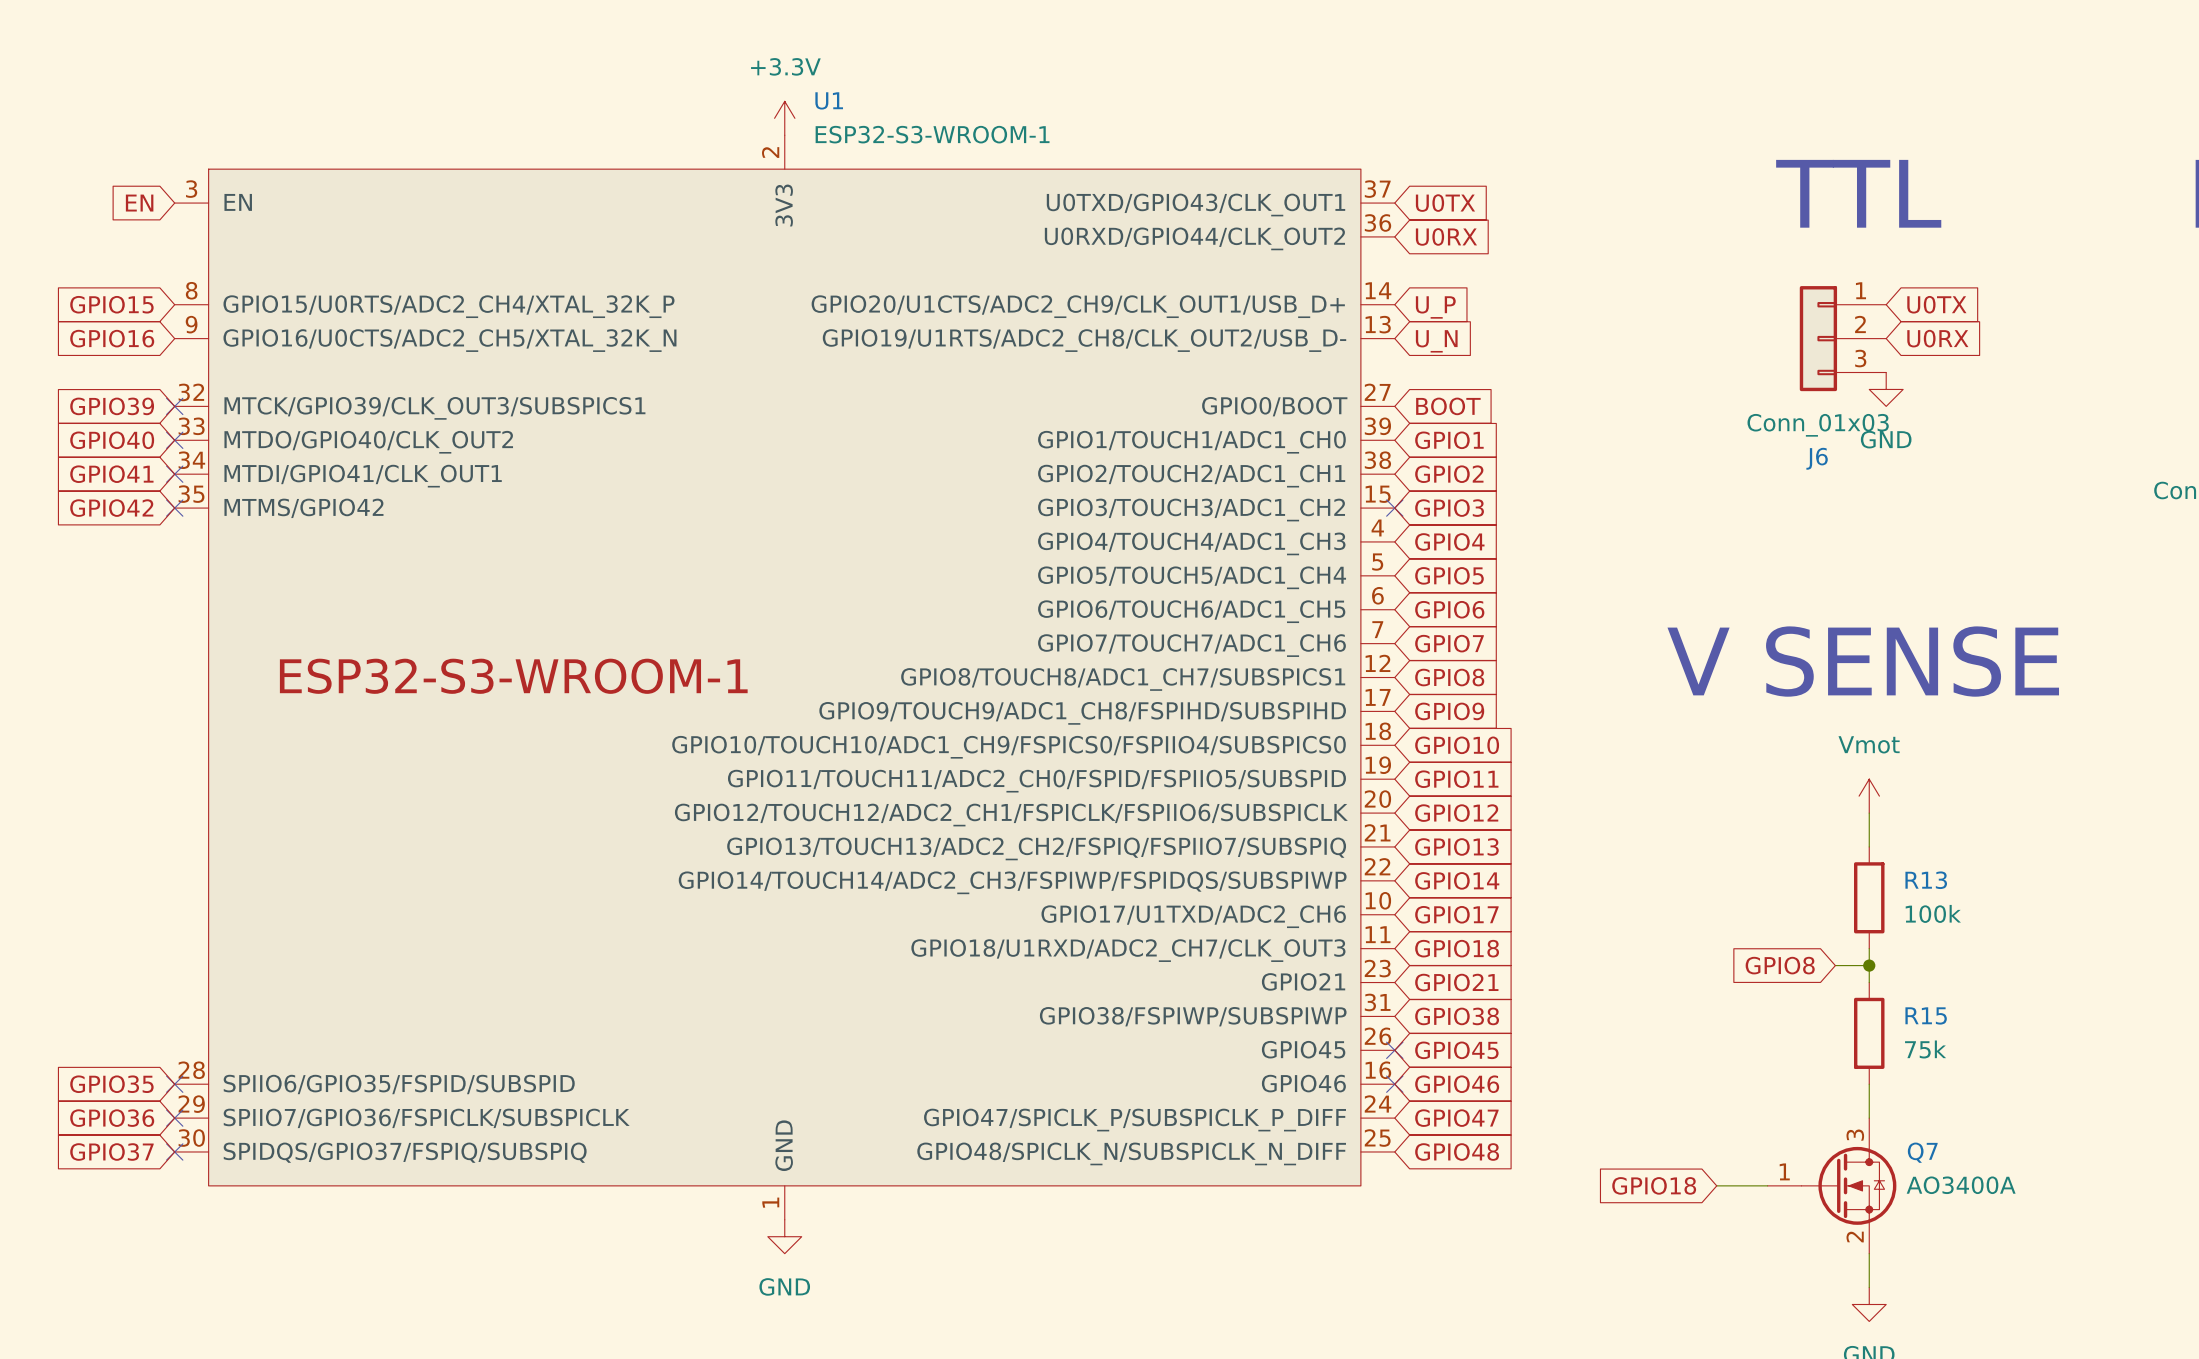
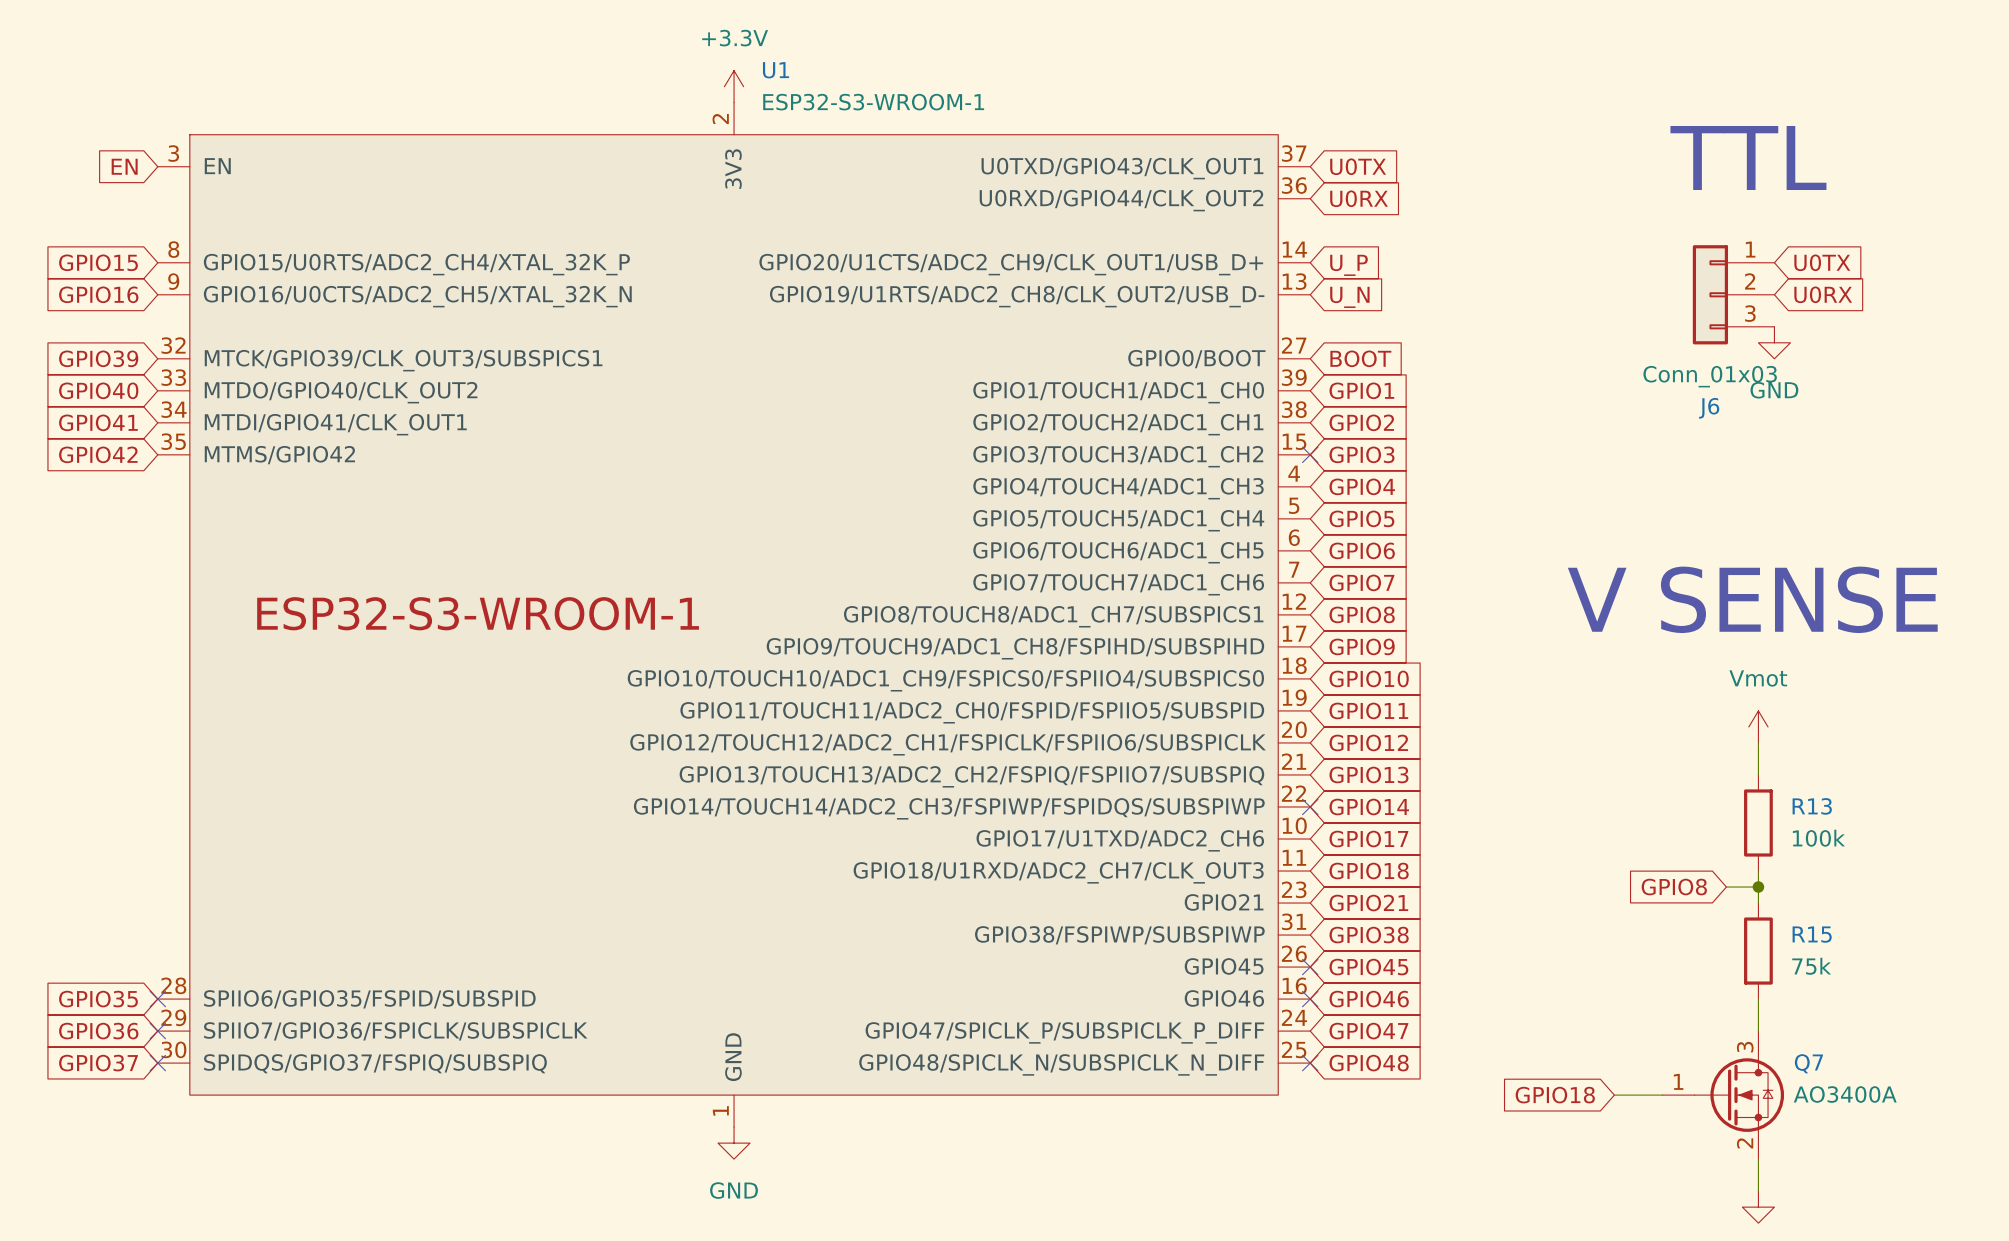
no-connect mark: (174, 406) -> none
no-connect mark: (174, 440) -> none
no-connect mark: (174, 474) -> none
no-connect mark: (174, 508) -> none
no-connect mark: none -> (1310, 806)
no-connect mark: none -> (1310, 1063)

